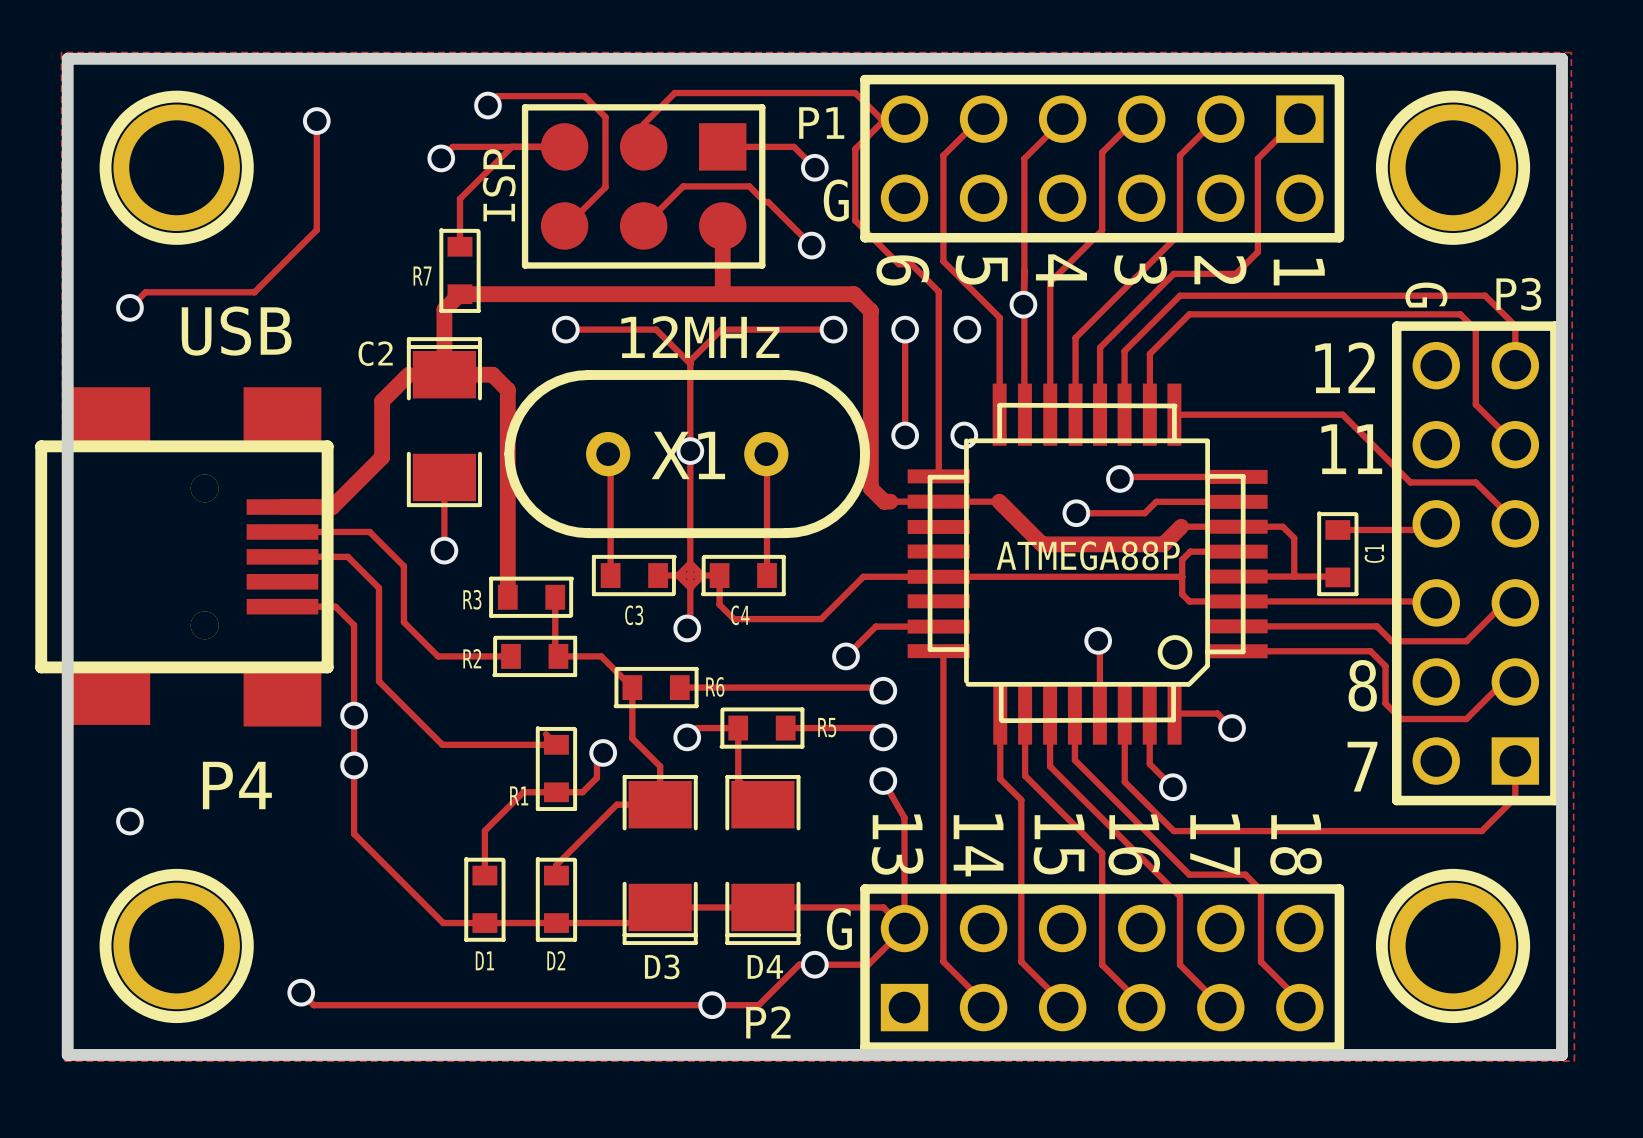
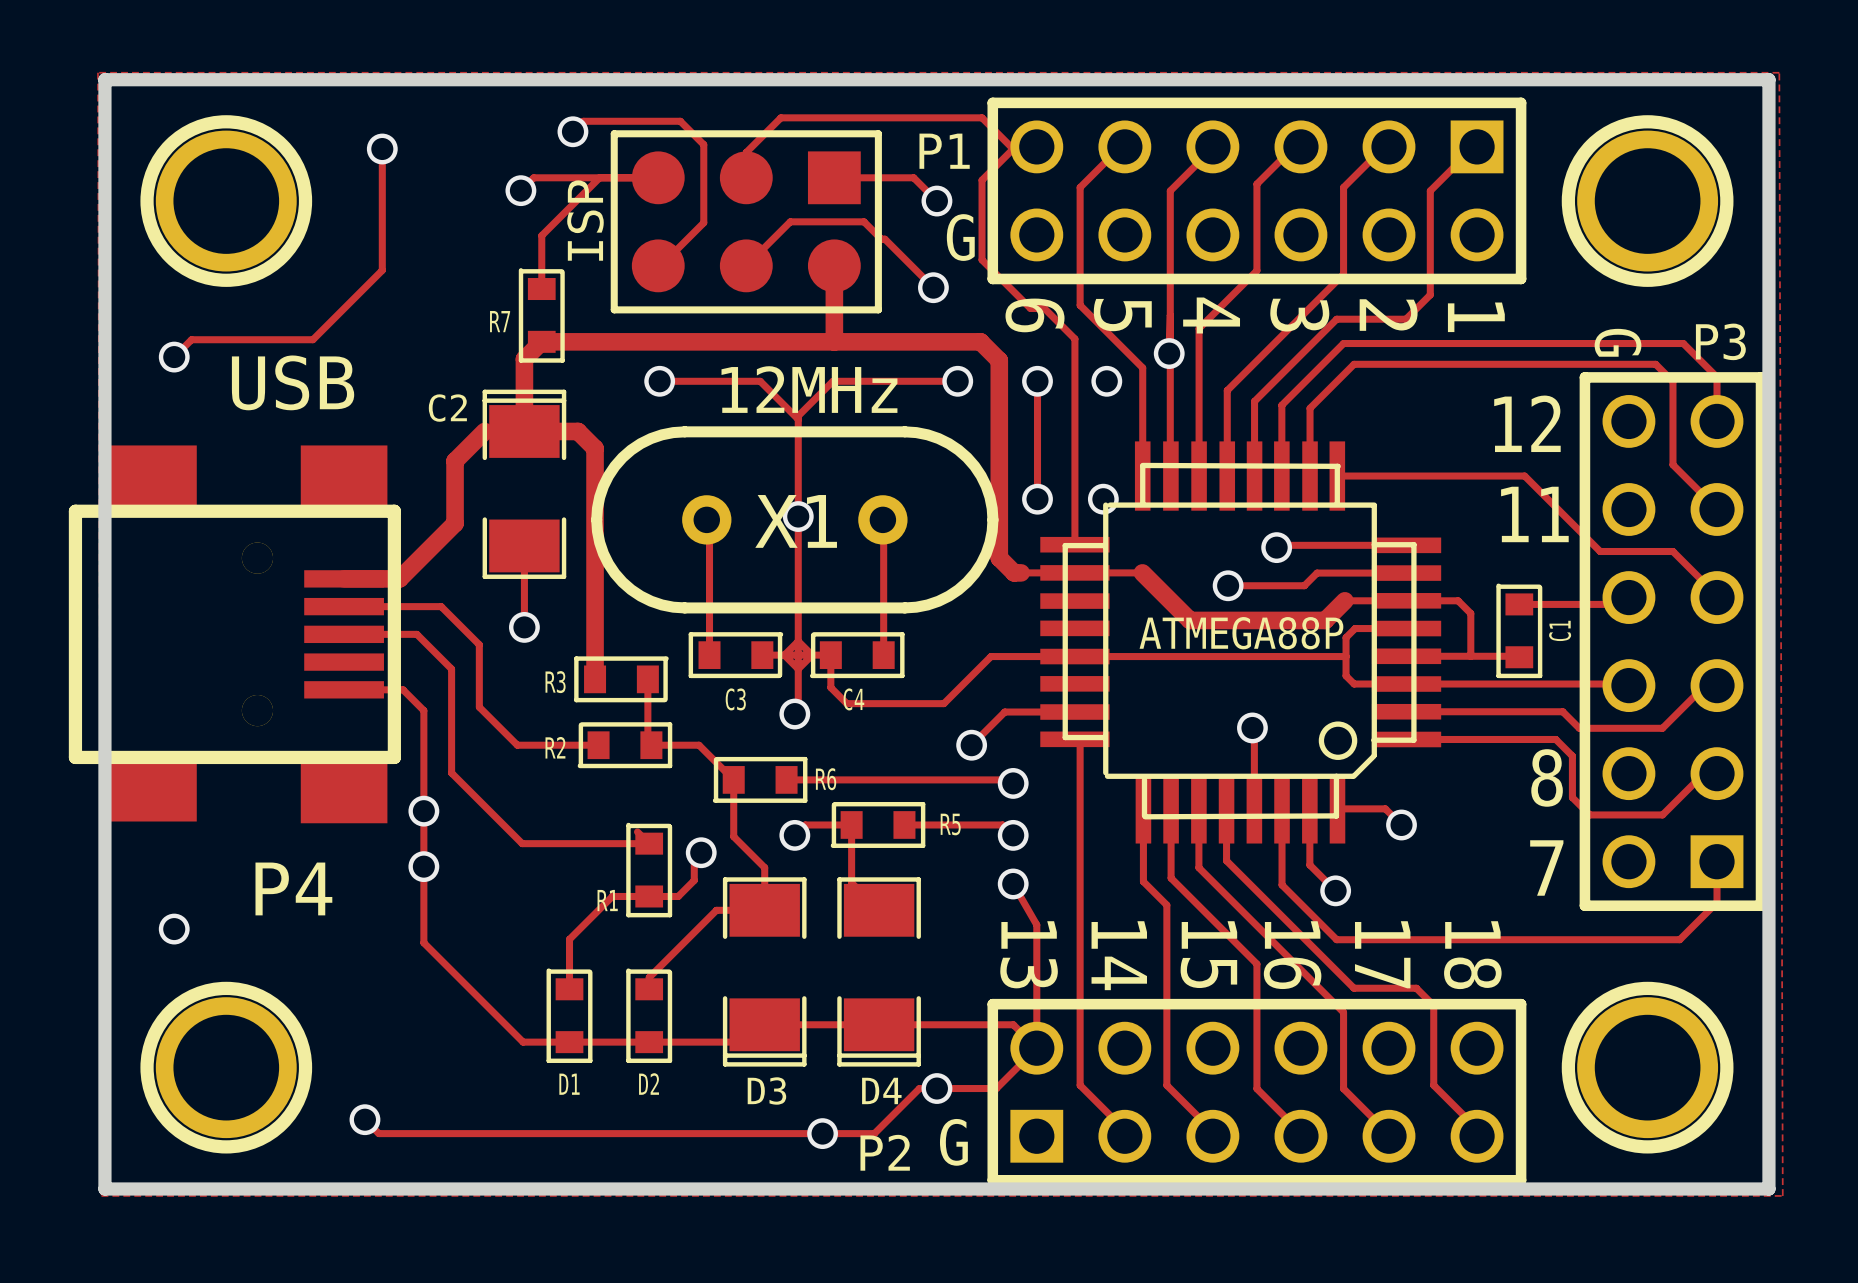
text position: G (839, 928) -> G (953, 1142)

